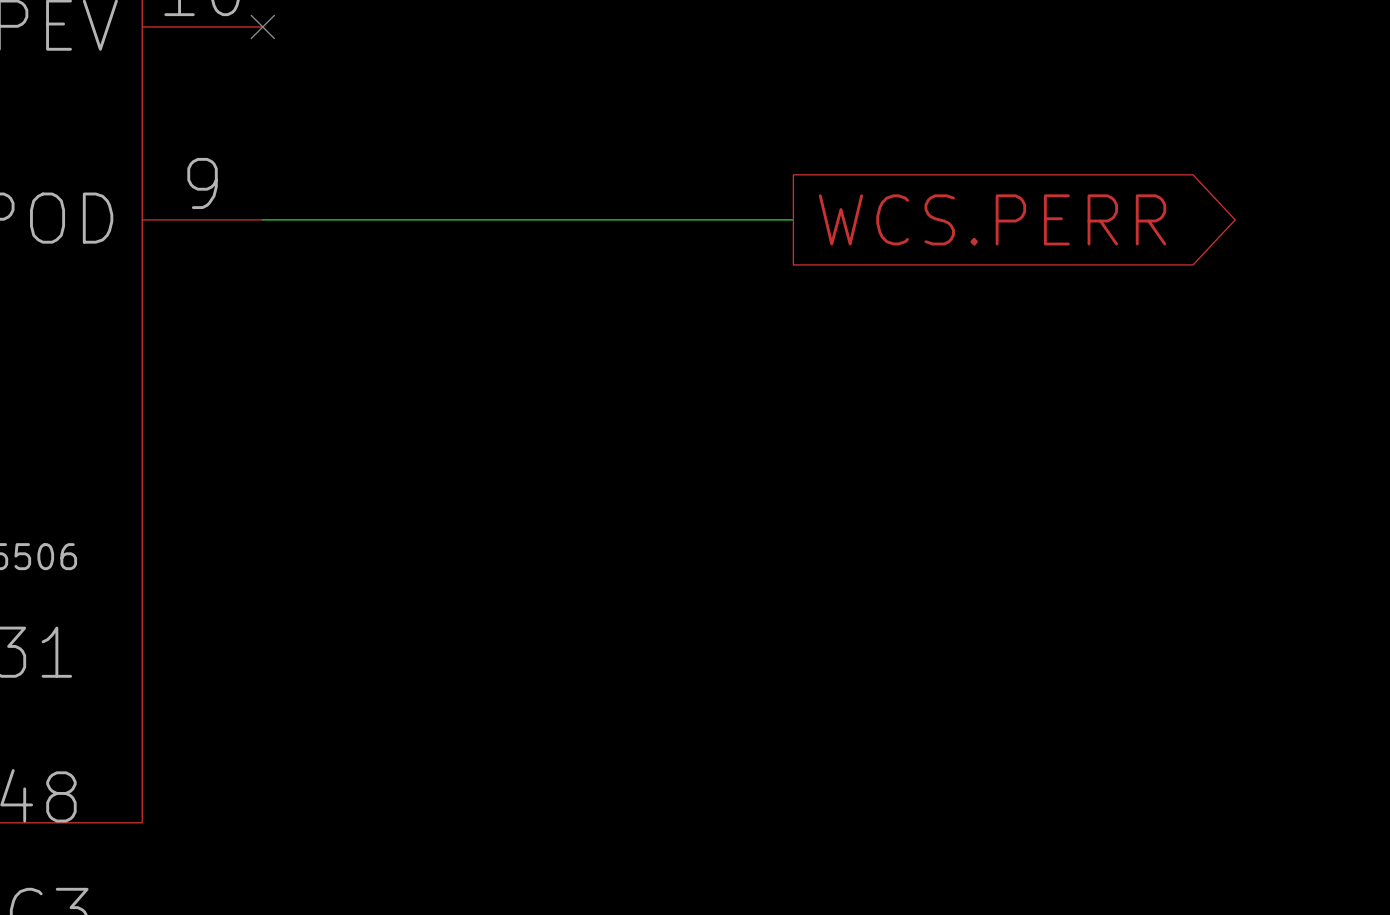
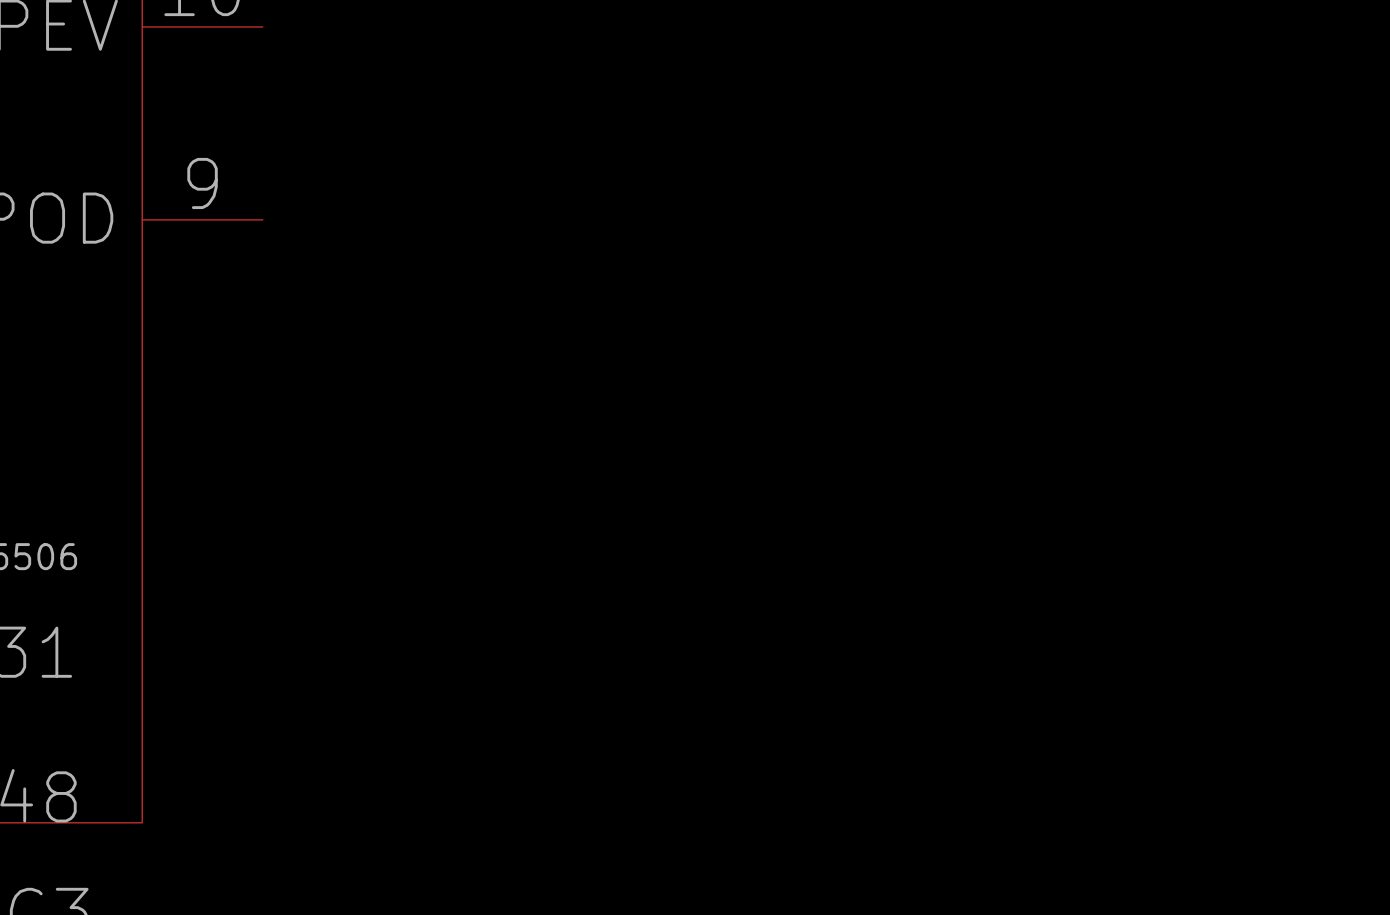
no-connect mark: (262, 26) -> none
wire: (262, 219) (793, 219) -> none
global label: WCS.PERR (992, 219) -> none

